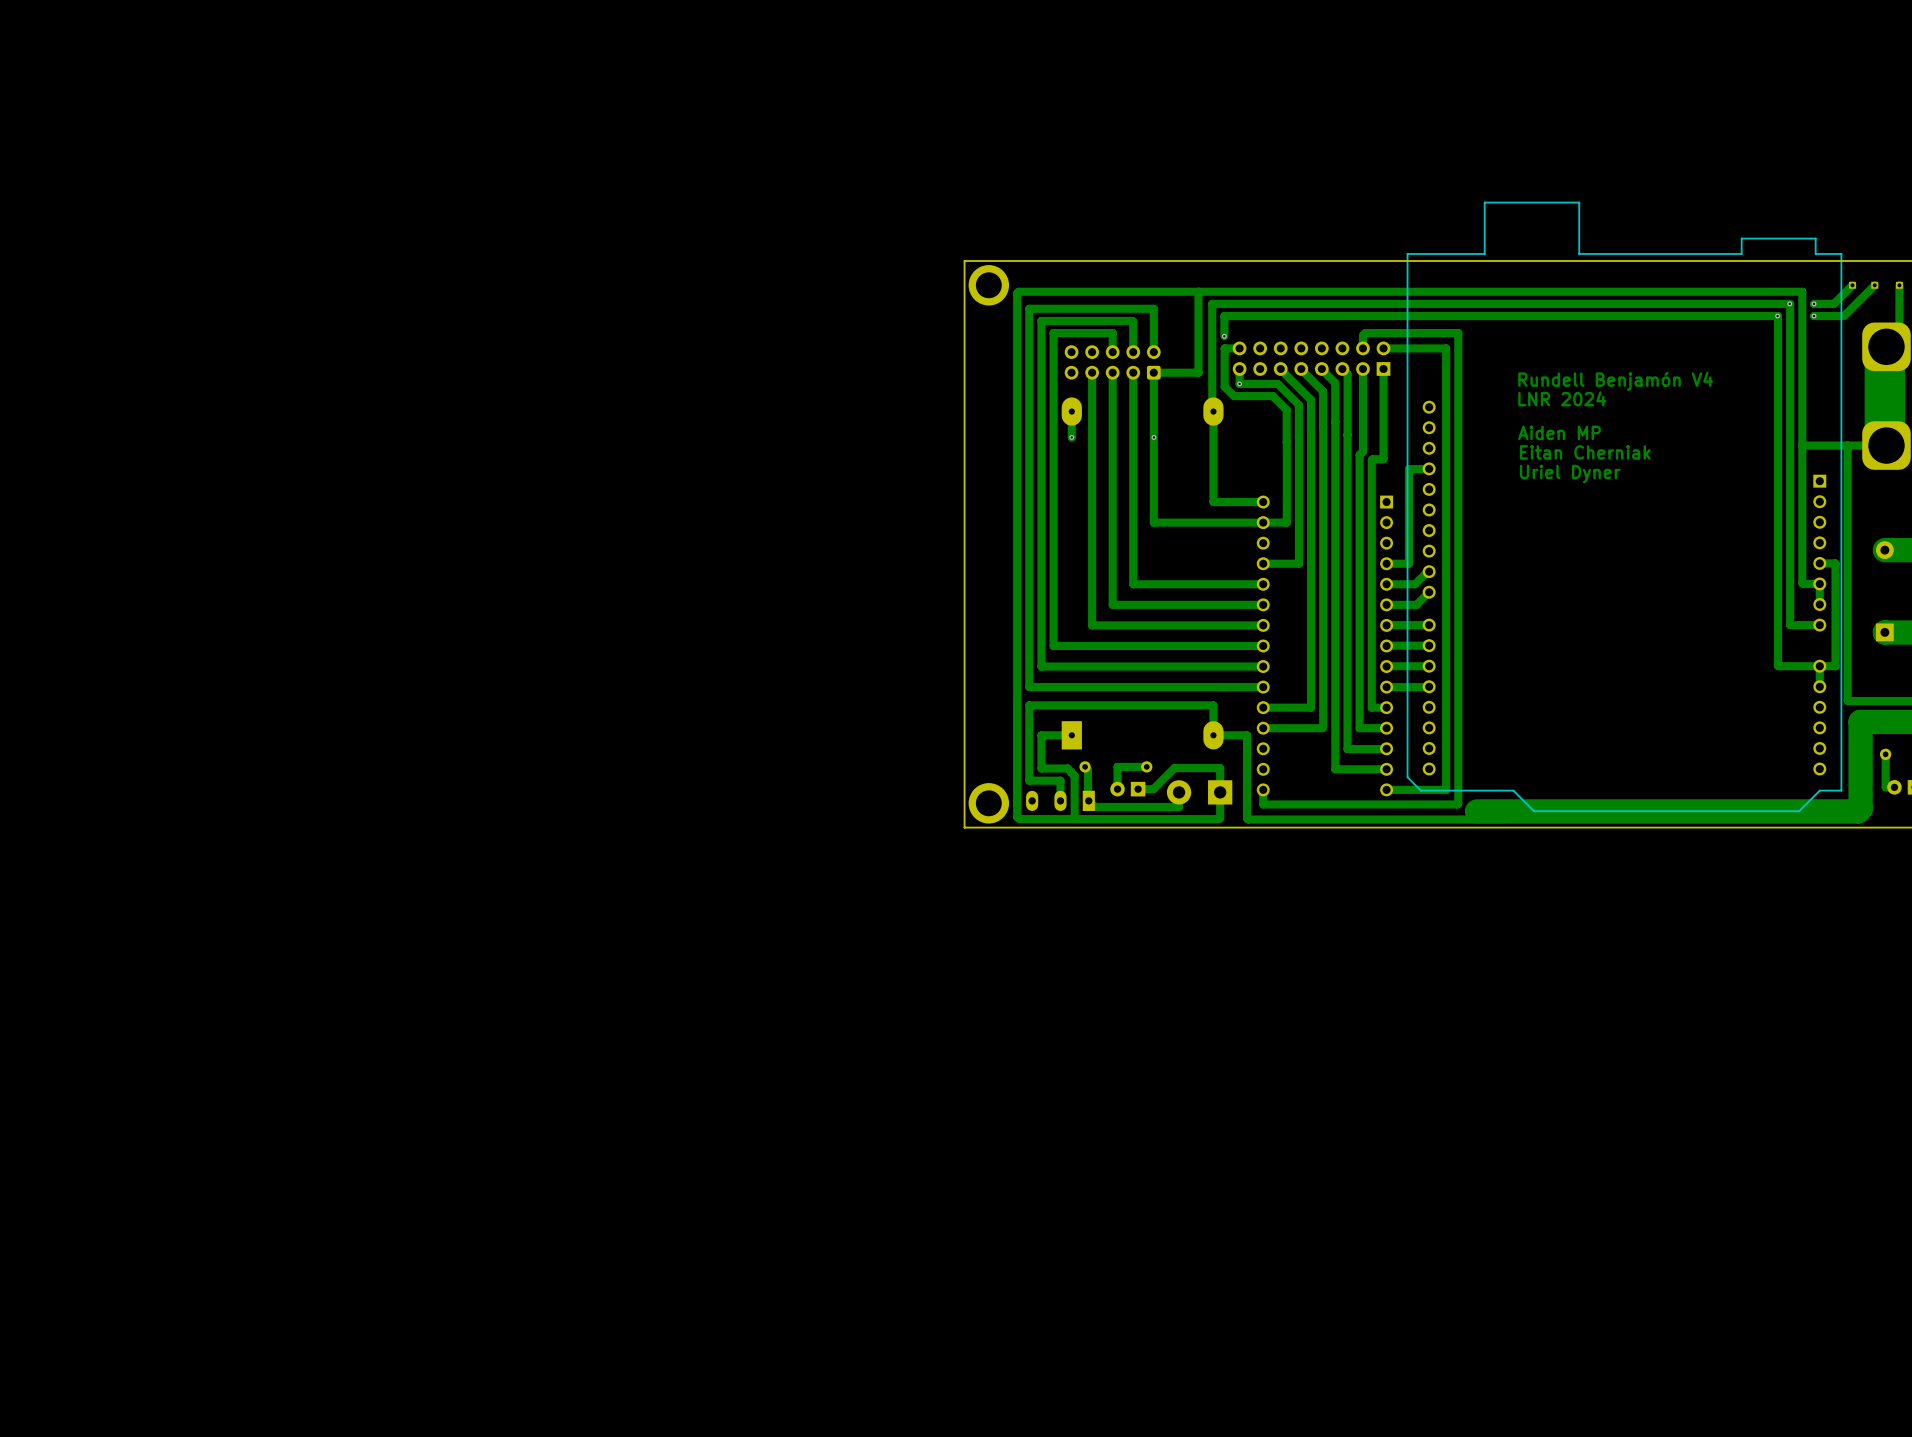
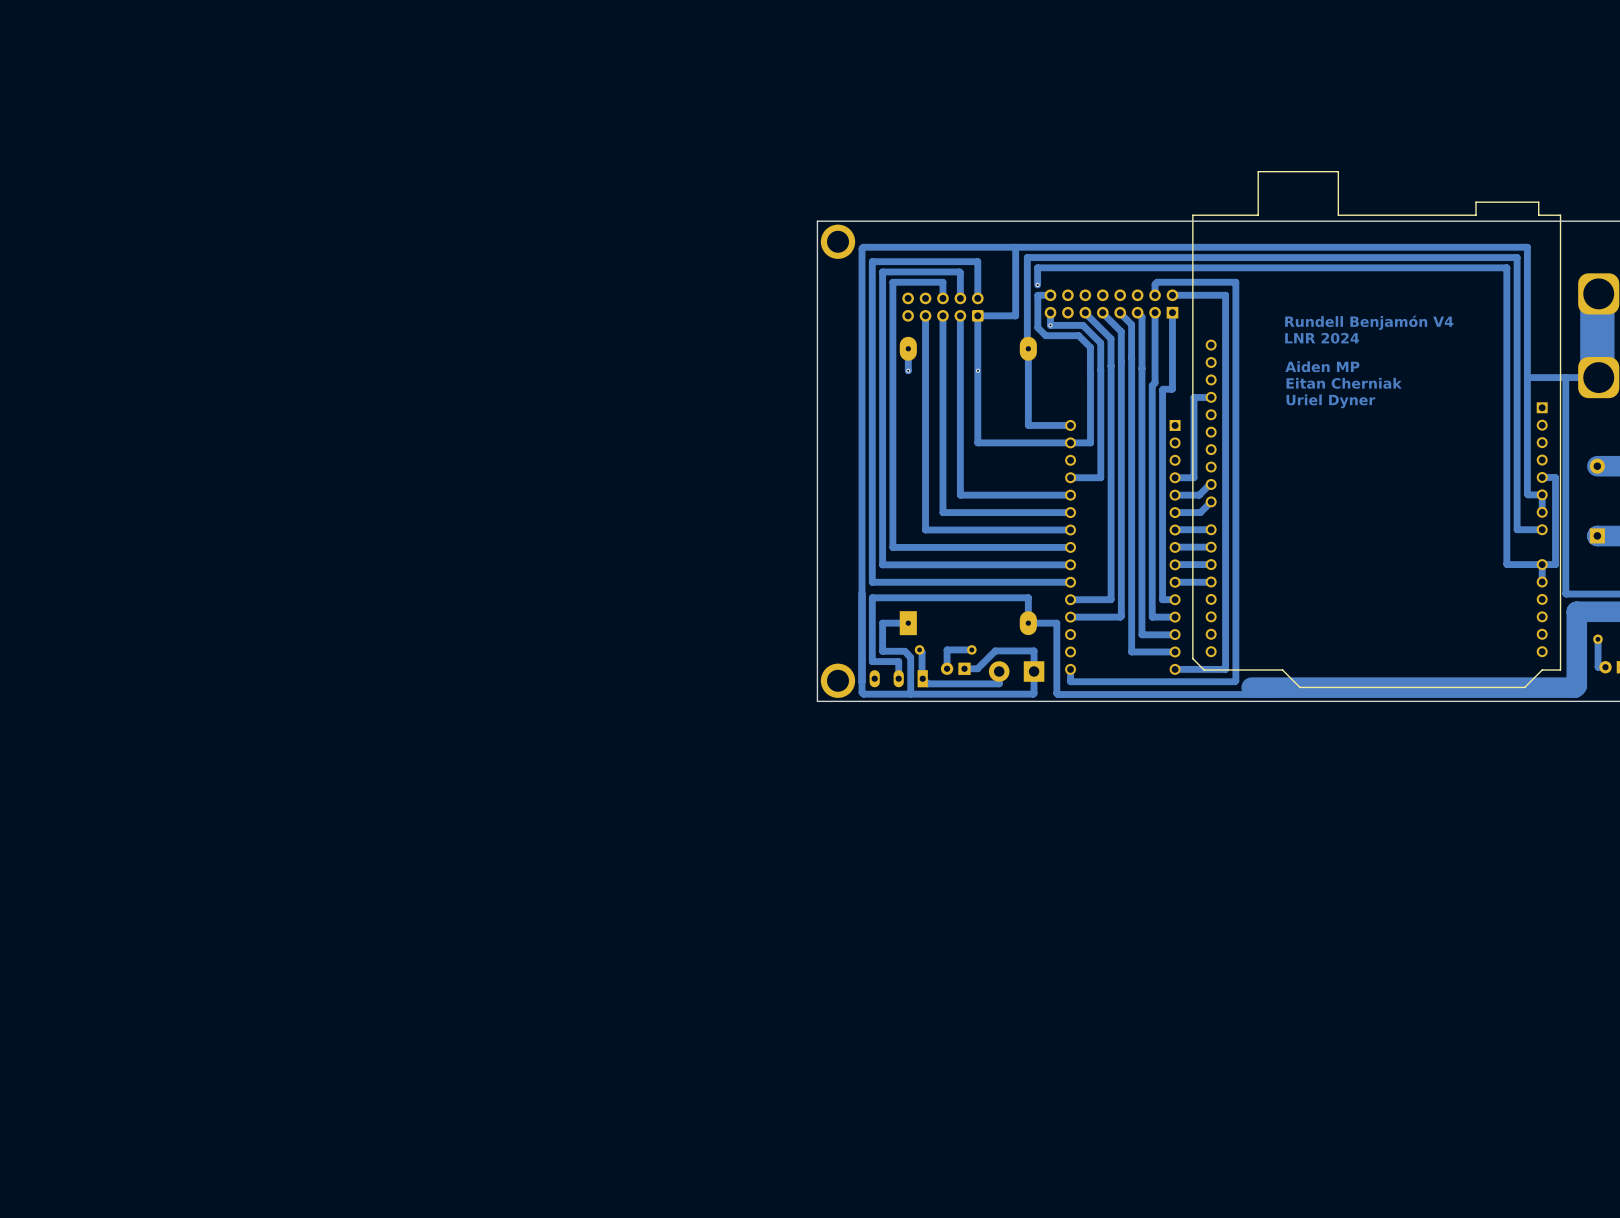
track: (1852, 285) (1833, 303) (1814, 303) -> none
part: (1852, 285) -> none
track: (1874, 285) (1843, 316) (1814, 316) -> none
part: (1874, 285) -> none
track: (1899, 285) (1899, 333) (1886, 346) -> none
part: (1899, 285) -> none
via: (1789, 303) -> none
via: (1814, 303) -> none
via: (1777, 316) -> none
via: (1814, 316) -> none

